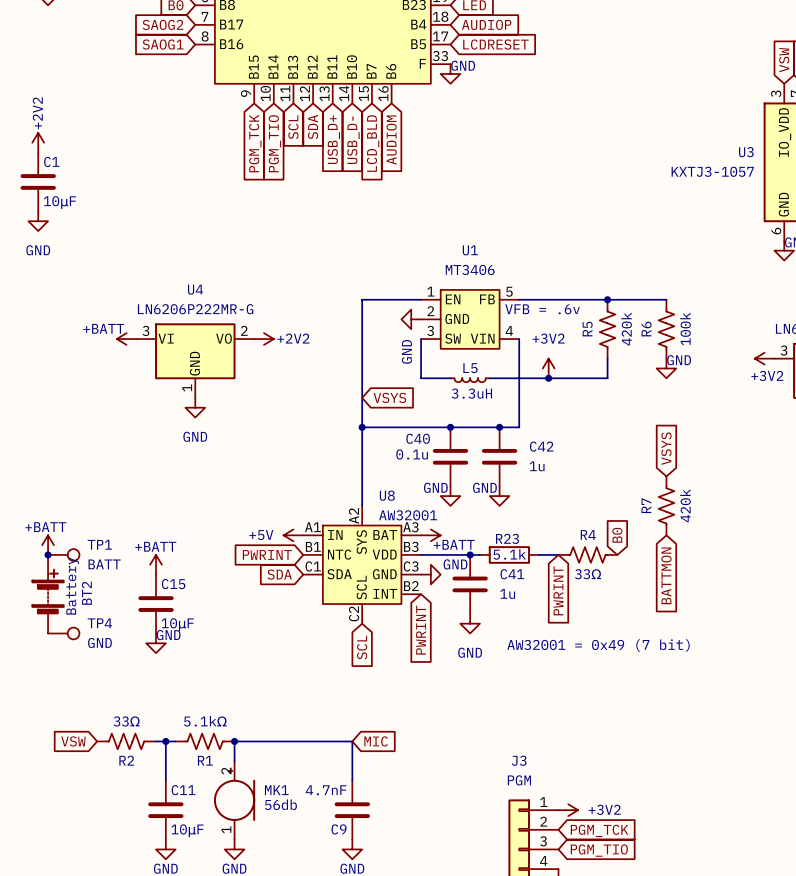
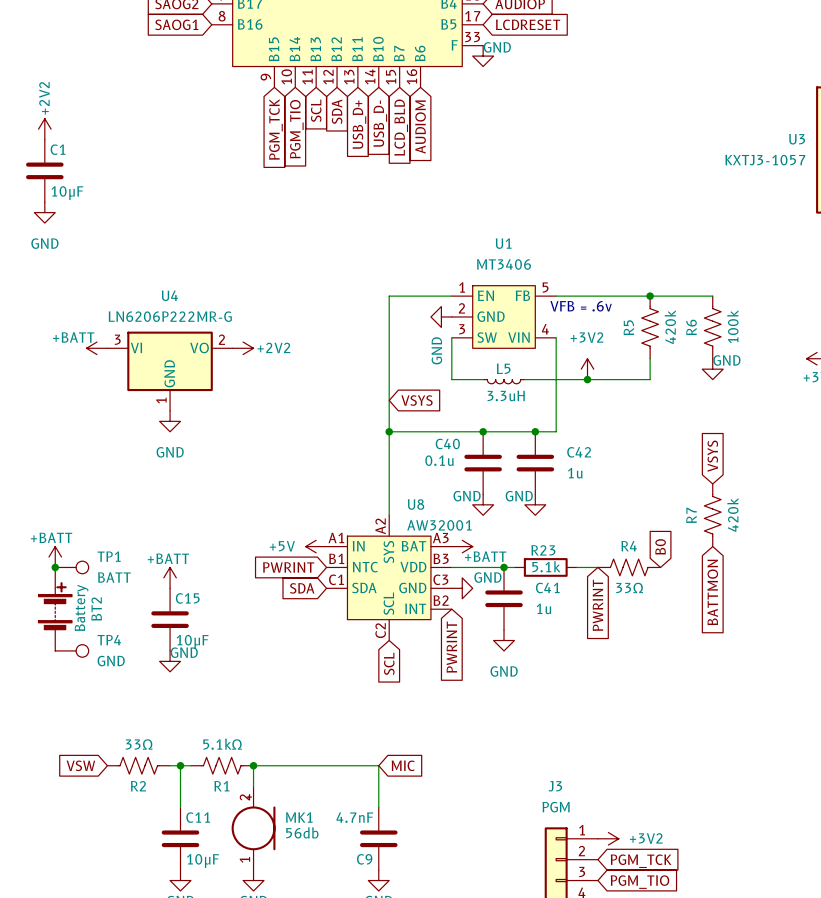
power symbol position: +BATT (126, 339) -> +BATT (97, 348)
power symbol position: +2V2 (264, 339) -> +2V2 (243, 348)
U4 position: (195, 360) -> (170, 371)
power symbol position: GND (195, 407) -> GND (170, 421)
text: AW32001 = 0x49 (7 bit) (598, 645) -> none

